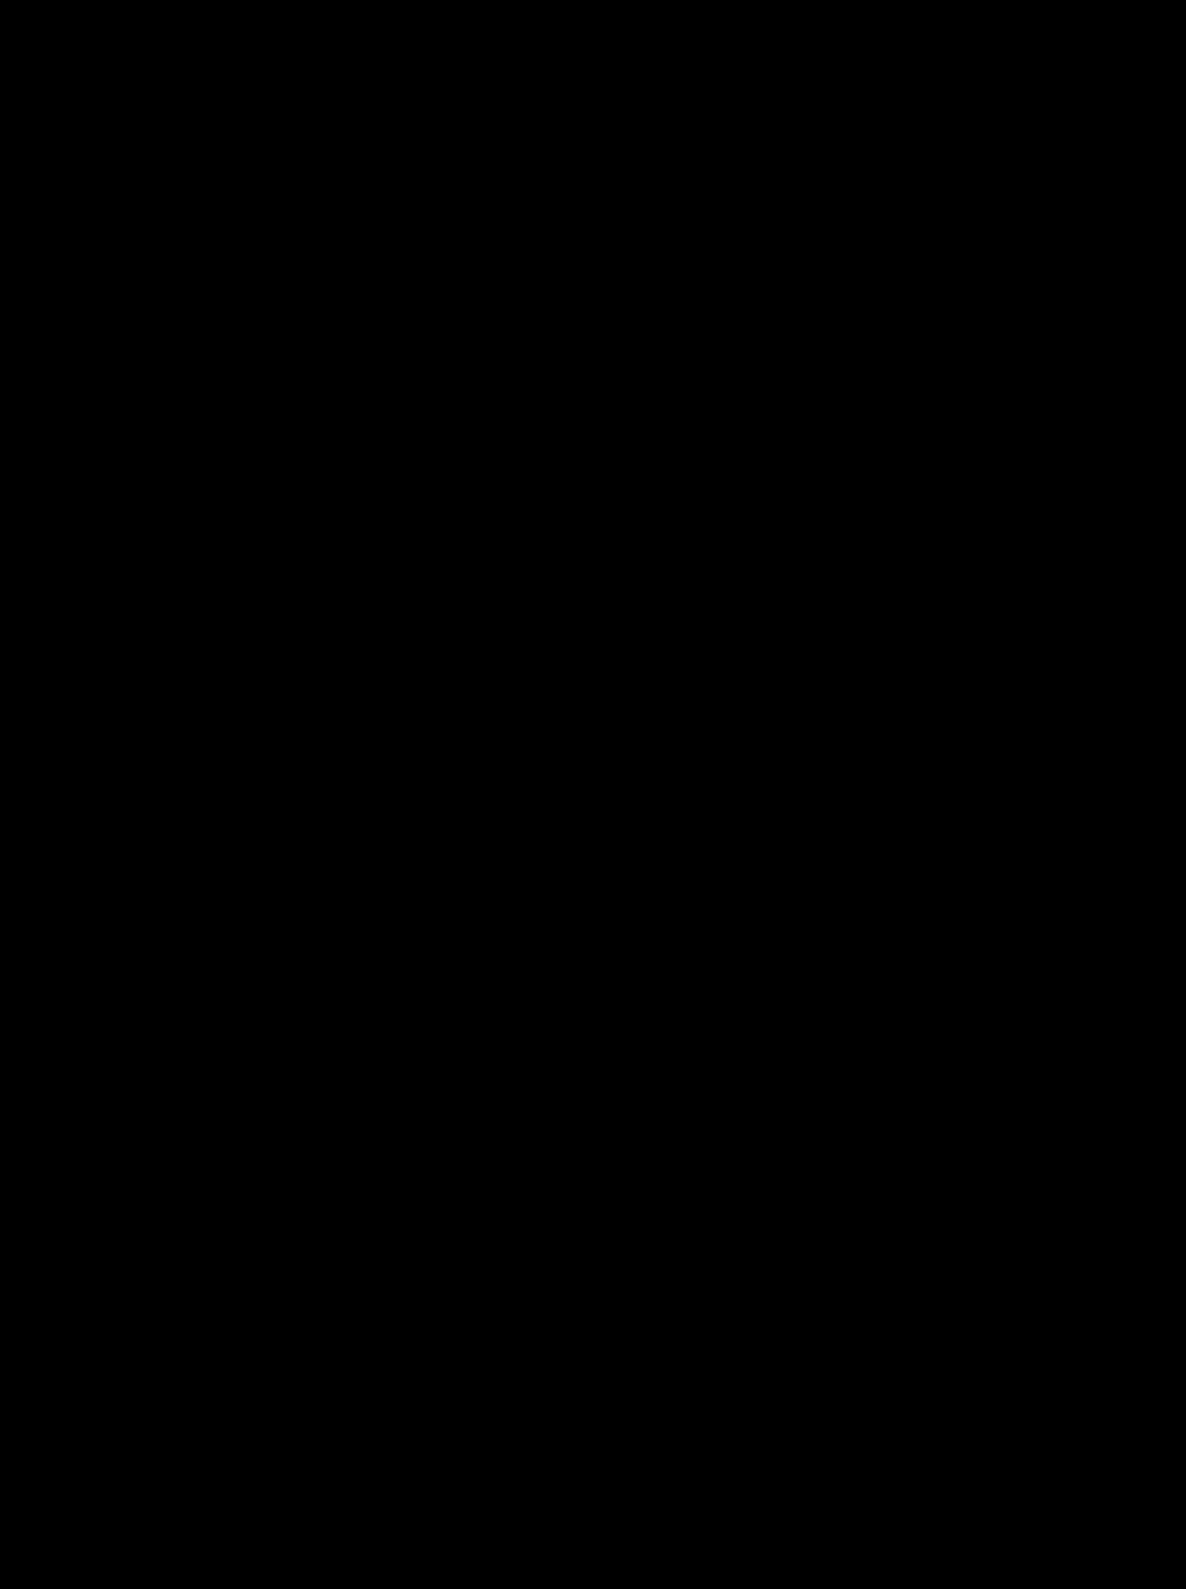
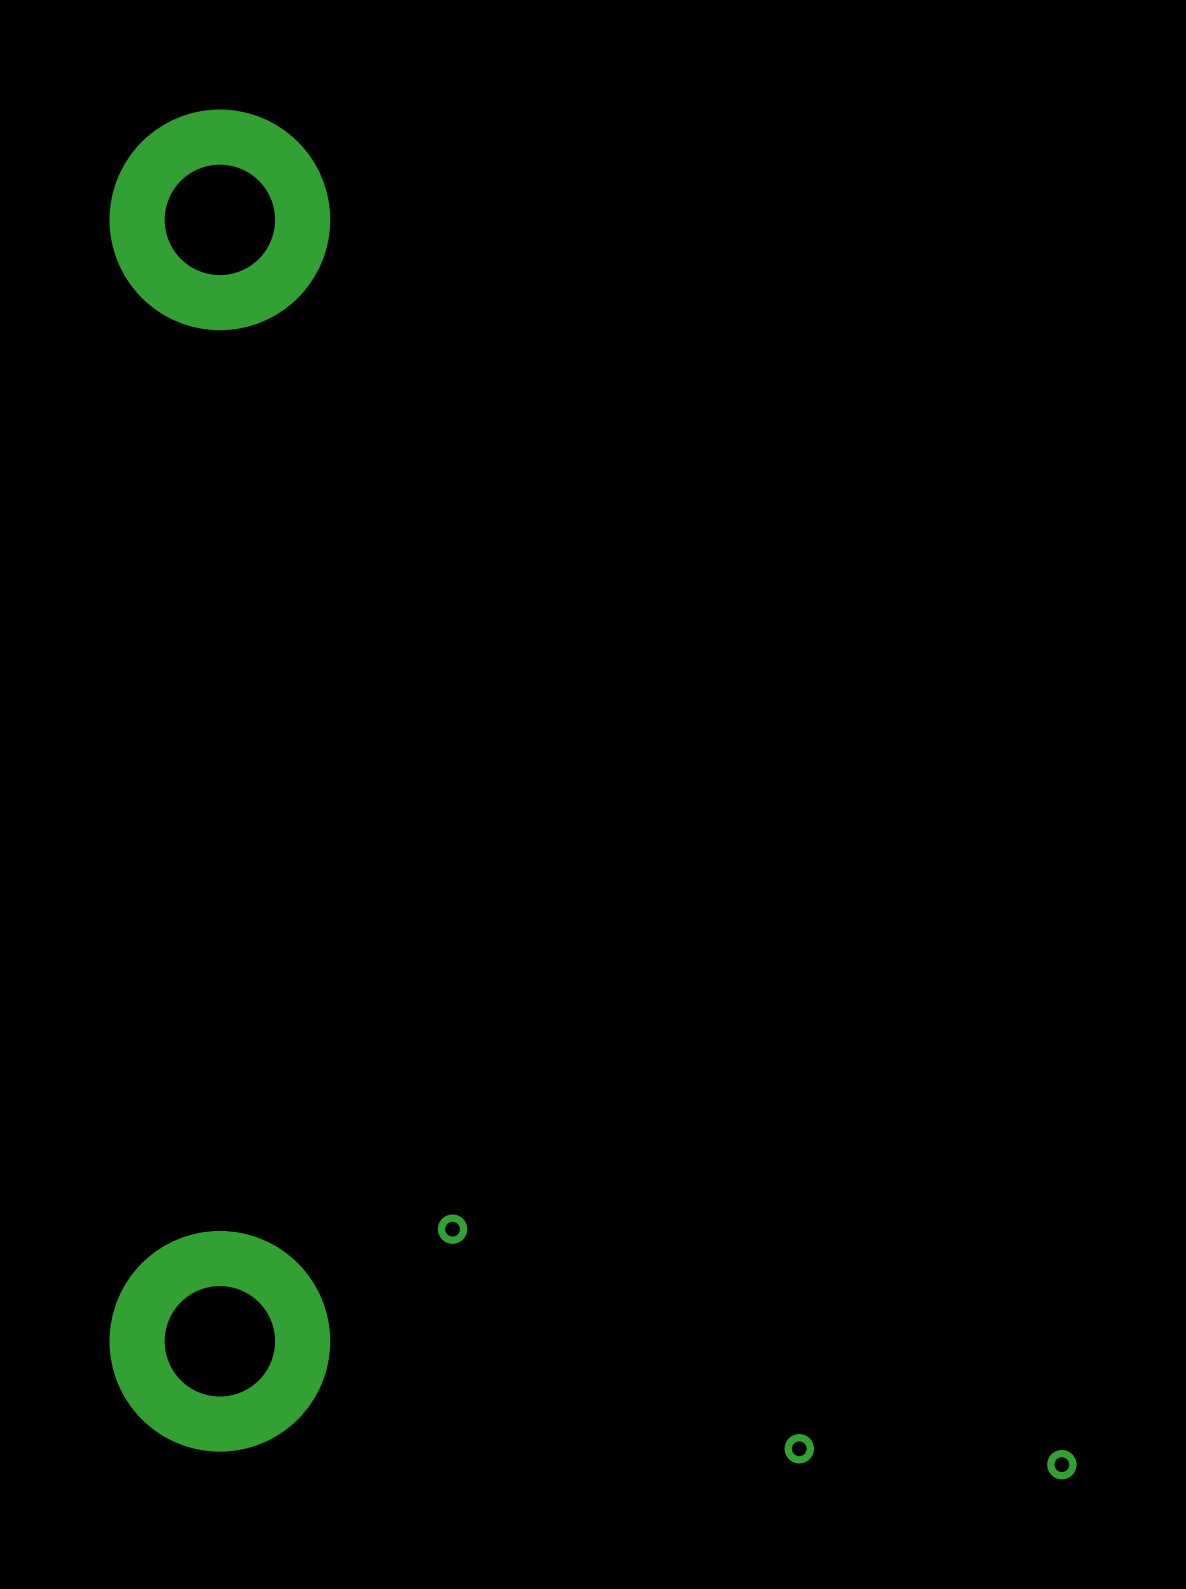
part: none -> (219, 219)
via: none -> (452, 1229)
part: none -> (219, 1341)
via: none -> (799, 1448)
via: none -> (1061, 1464)

